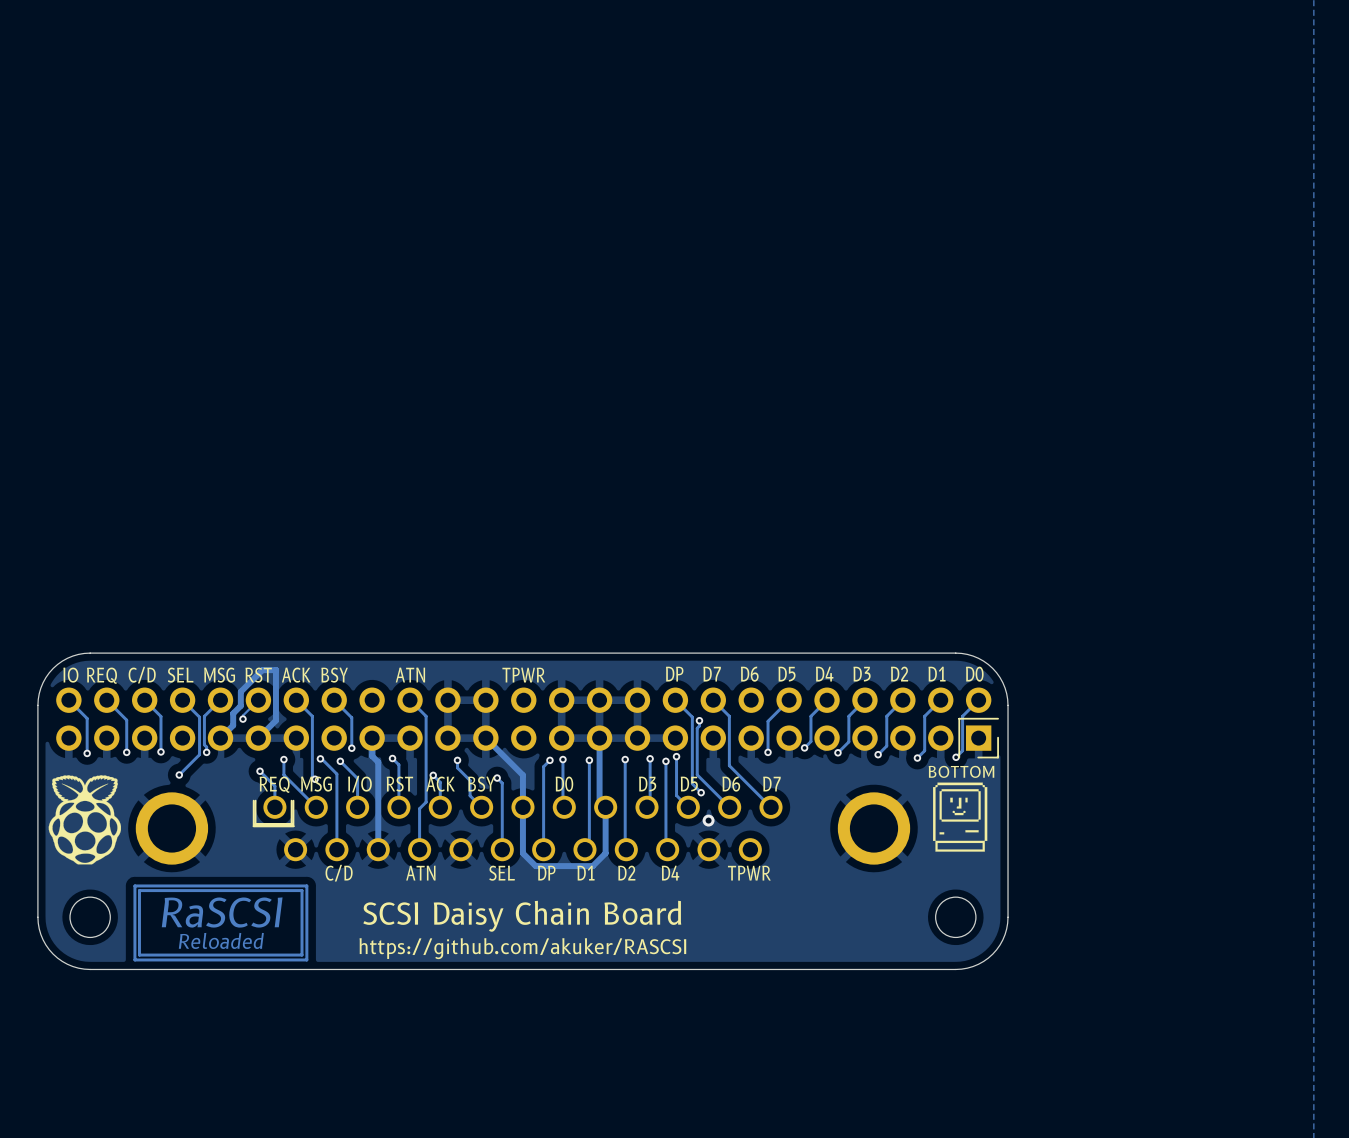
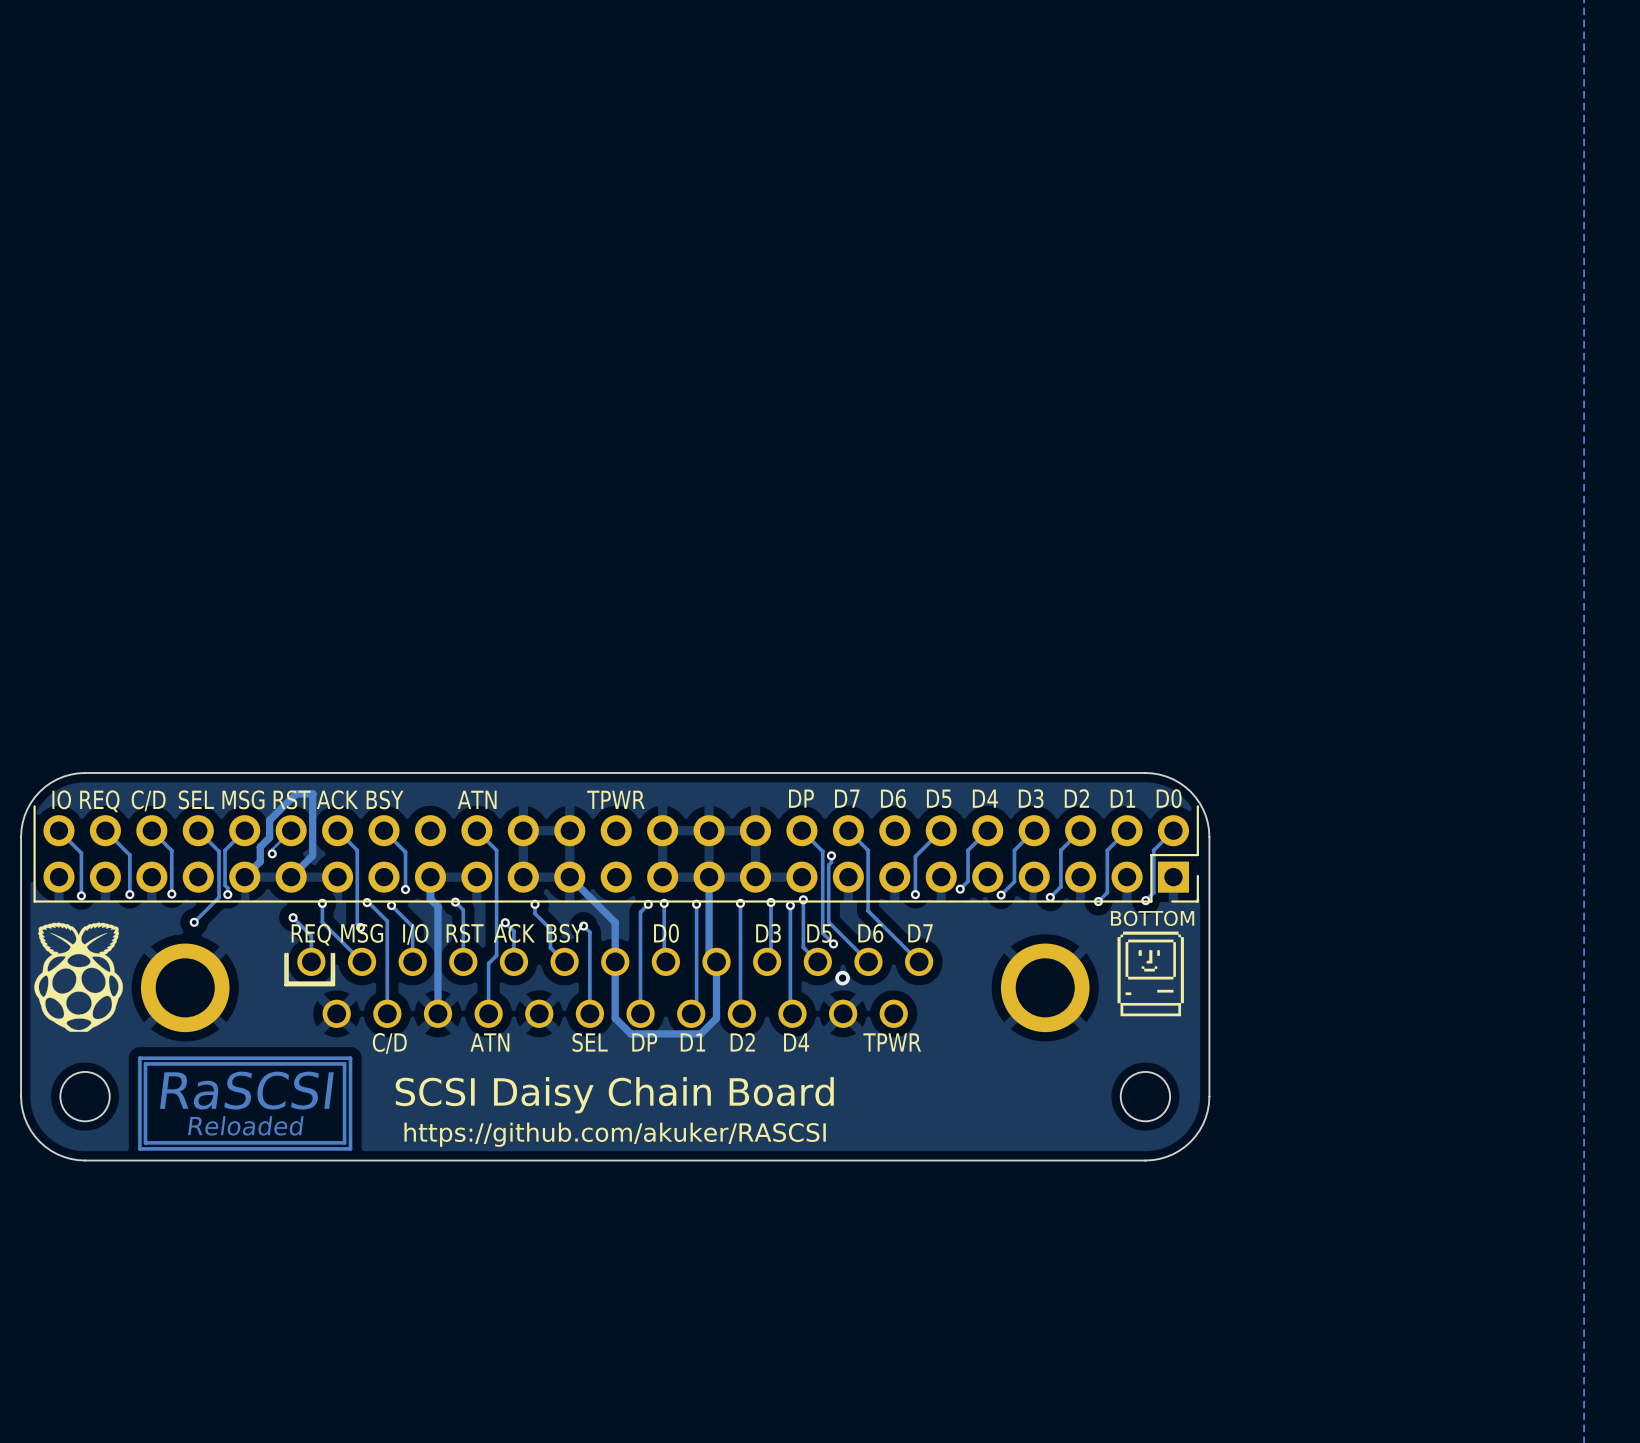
line: none -> (1197, 806) (1197, 855) (1151, 855) (1151, 901) (34, 901) (34, 806)
part footprint: [56, 687, 999, 759] -> [43, 815, 1190, 893]
line: none -> (1197, 875) (1197, 901) (1172, 901)

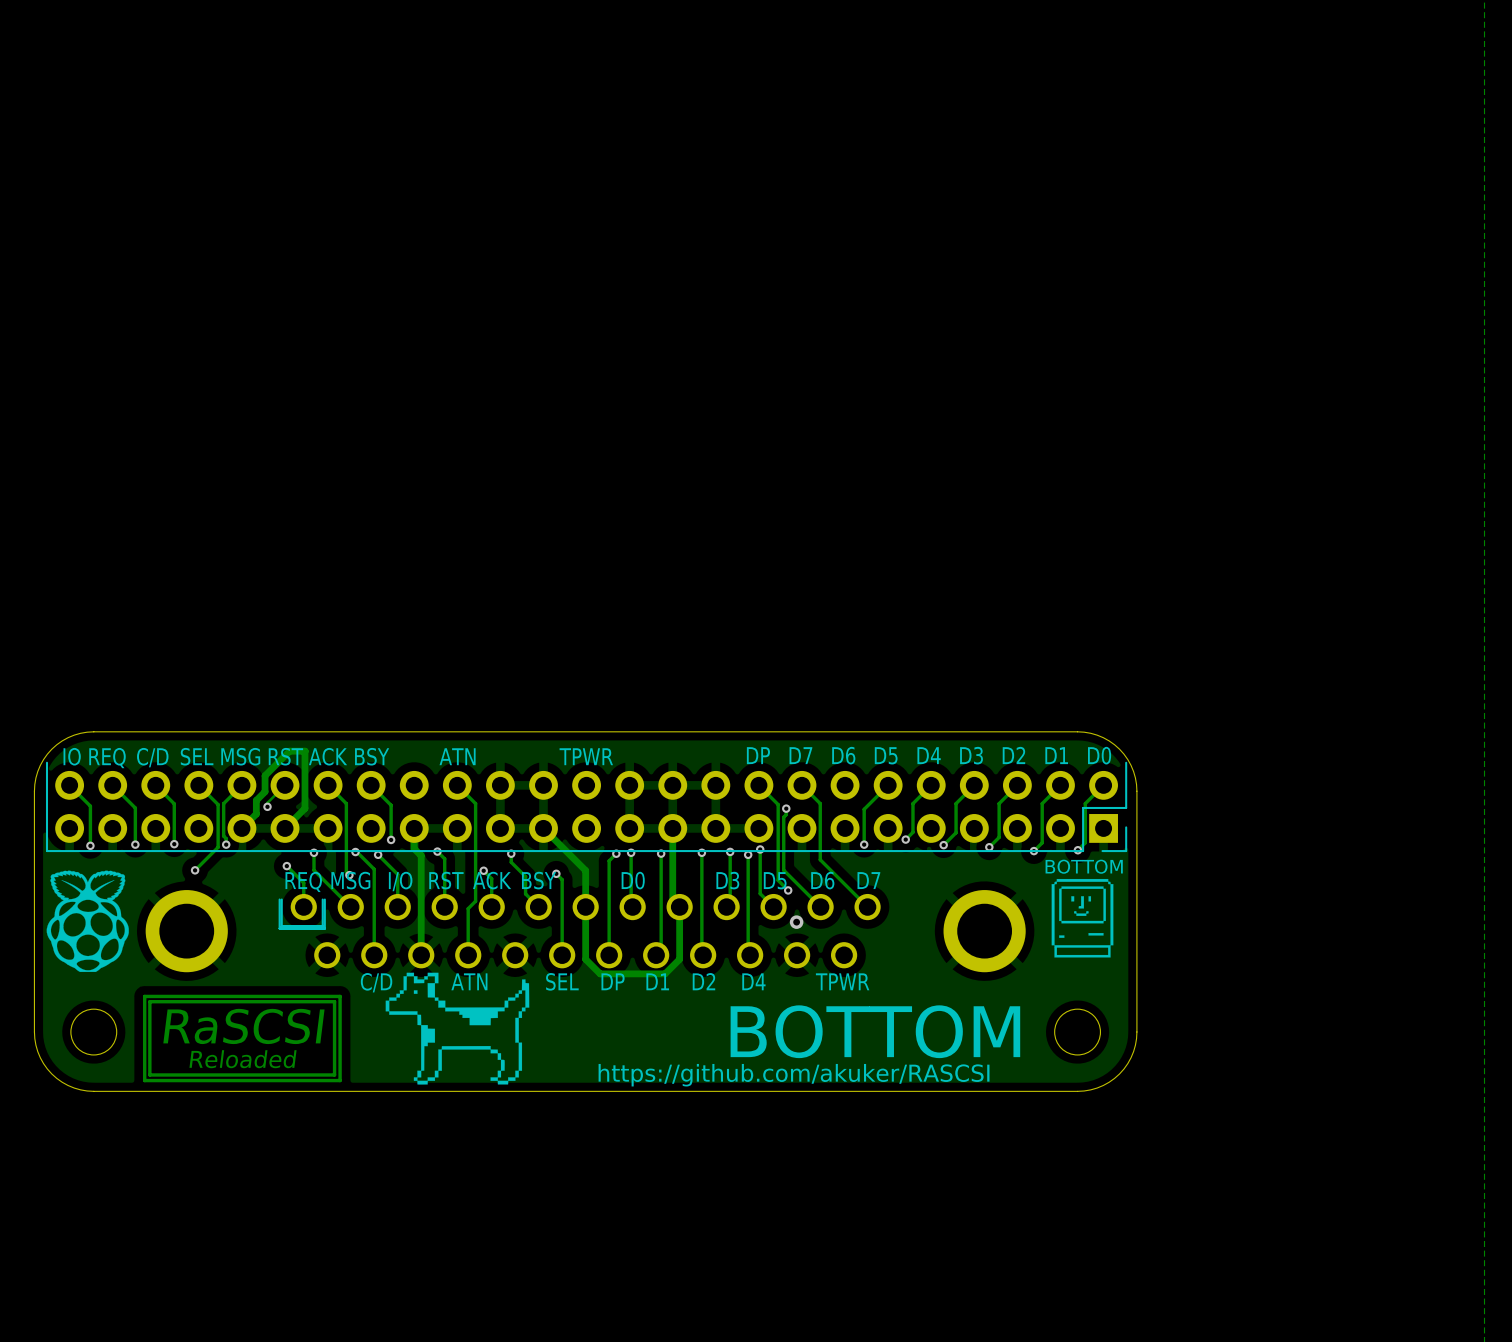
drawing: none -> [385, 972, 530, 1085]
text: SCSI Daisy Chain Board (614, 1095) -> none
text: none -> BOTTOM (875, 1031)
text position: https://github.com/akuker/RASCSI (615, 1134) -> https://github.com/akuker/RASCSI (794, 1075)

